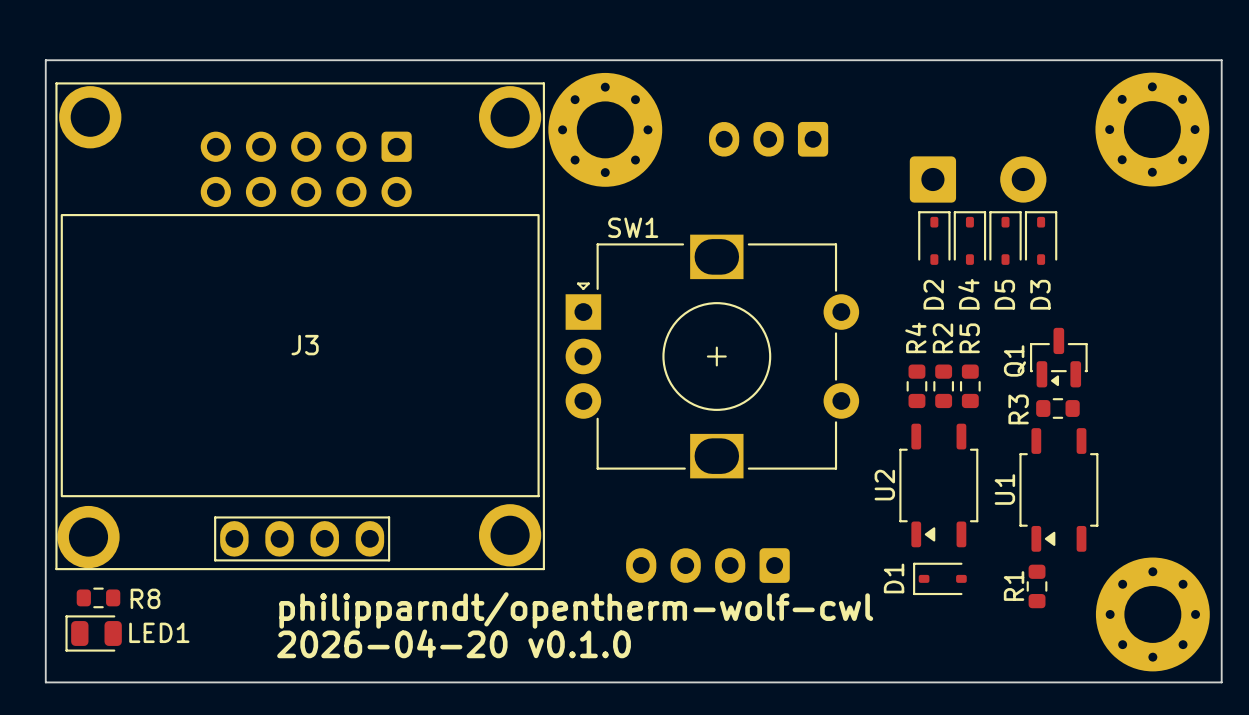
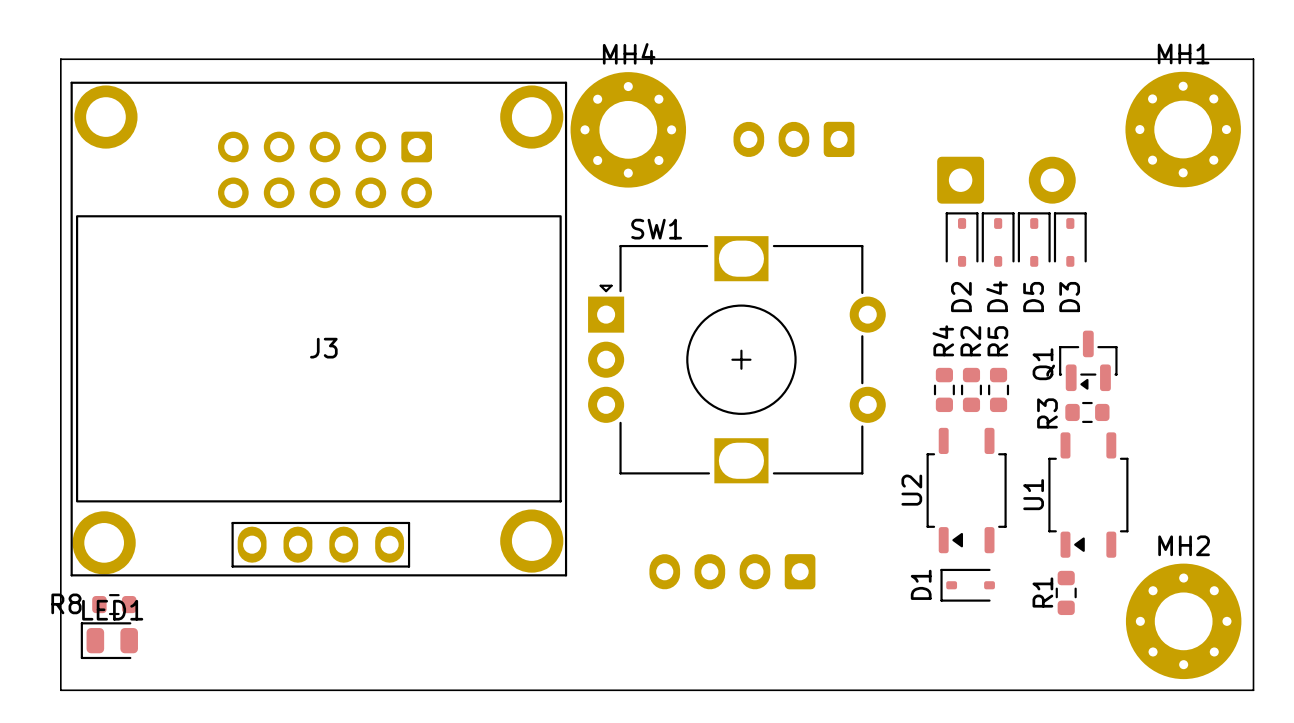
MH4 name: none -> MH4 (629, 53)
MH1 name: none -> MH1 (1183, 53)
MH2 name: none -> MH2 (1184, 545)
R8 name position: R8 (145, 598) -> R8 (66, 603)
text: philipparndt/opentherm-wolf-cwl (576, 610) -> none
LED1 name position: LED1 (159, 632) -> LED1 (112, 610)
text: 2026-04-20 v0.1.0 (454, 643) -> none

